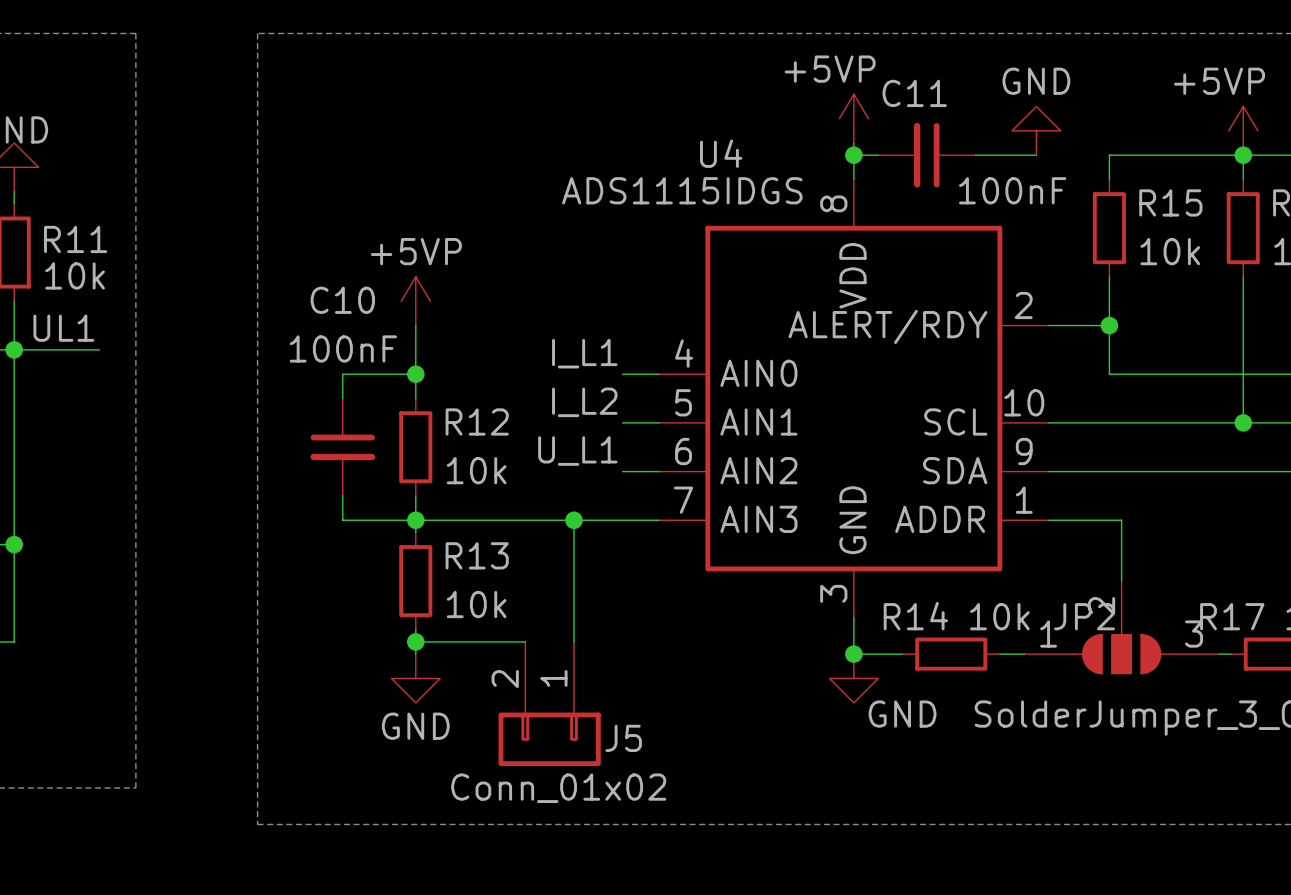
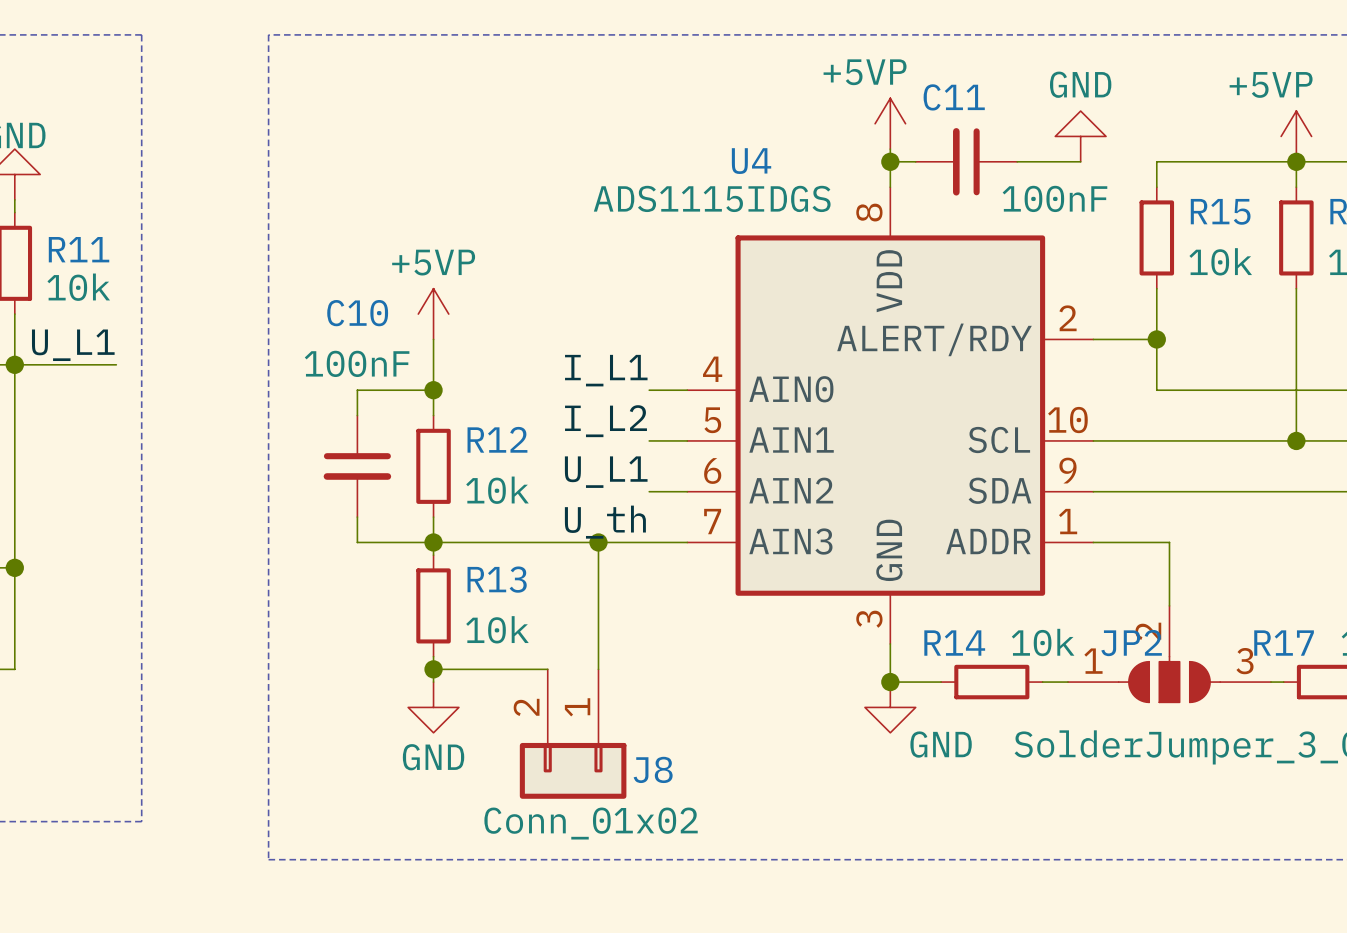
label: UL1 (63, 328) -> U_L1 (73, 345)
wire: none -> (103, 364) (116, 364)
label: none -> U_th (605, 522)
J5 name: J5 (623, 738) -> J8 (653, 769)

